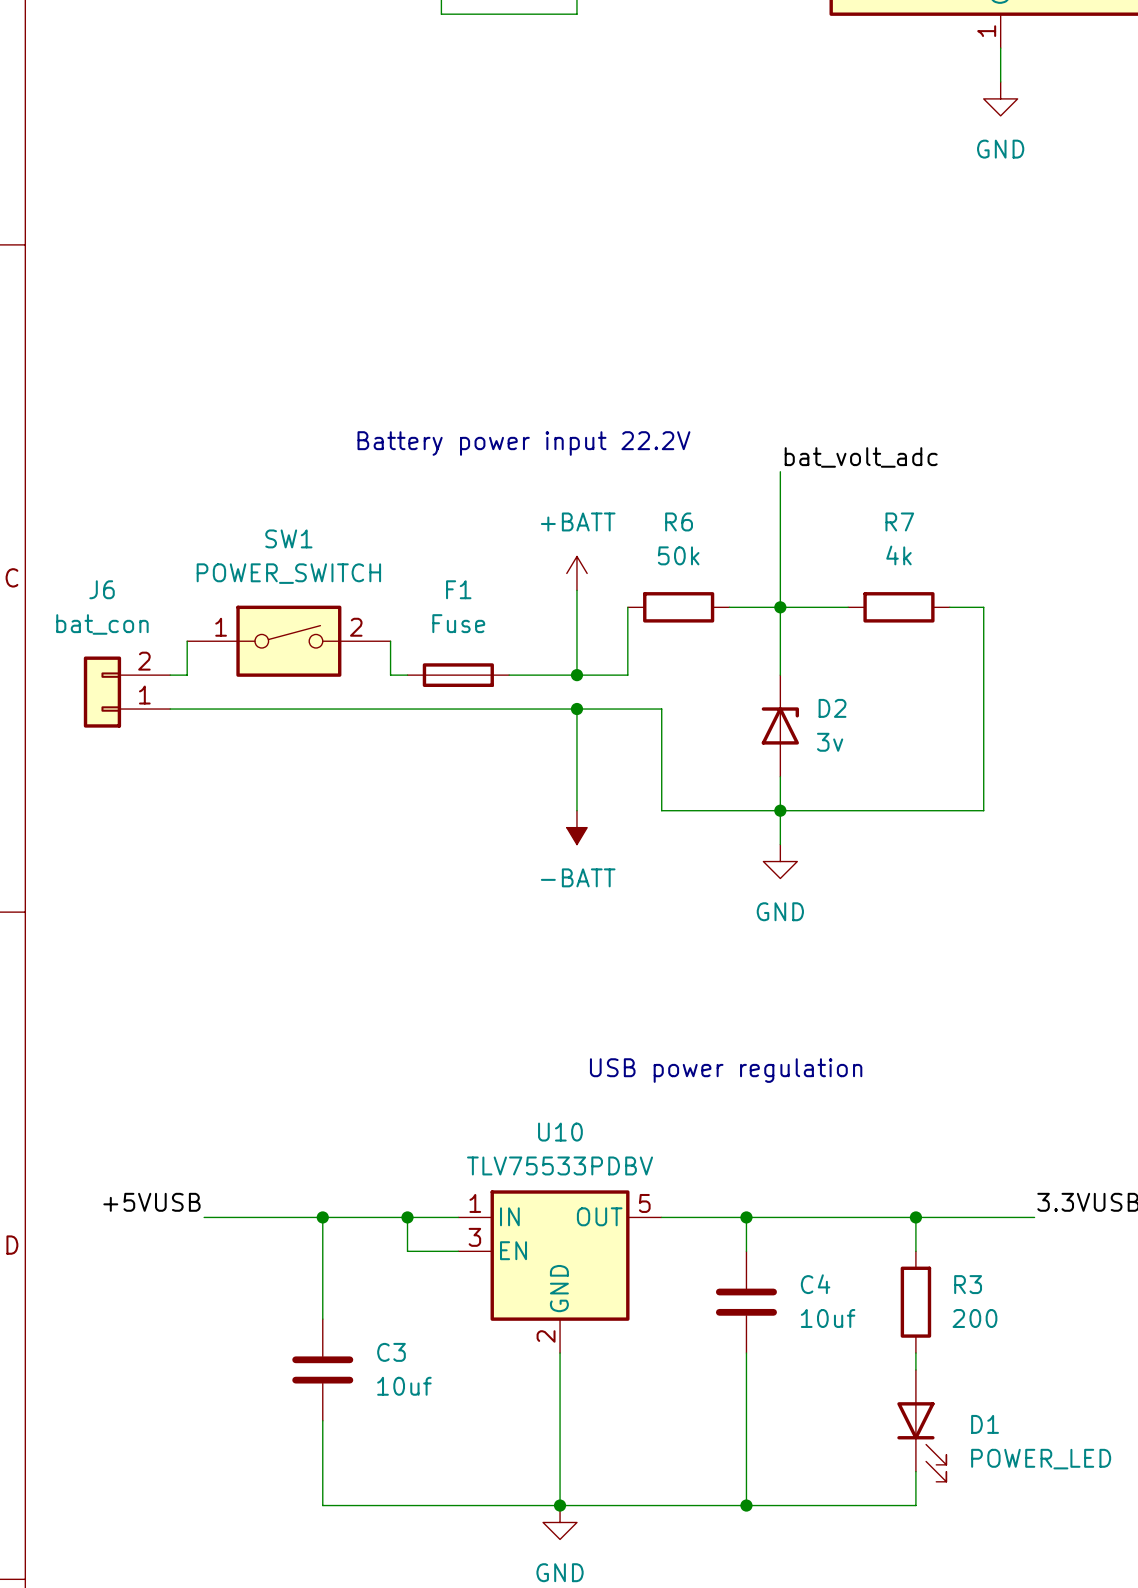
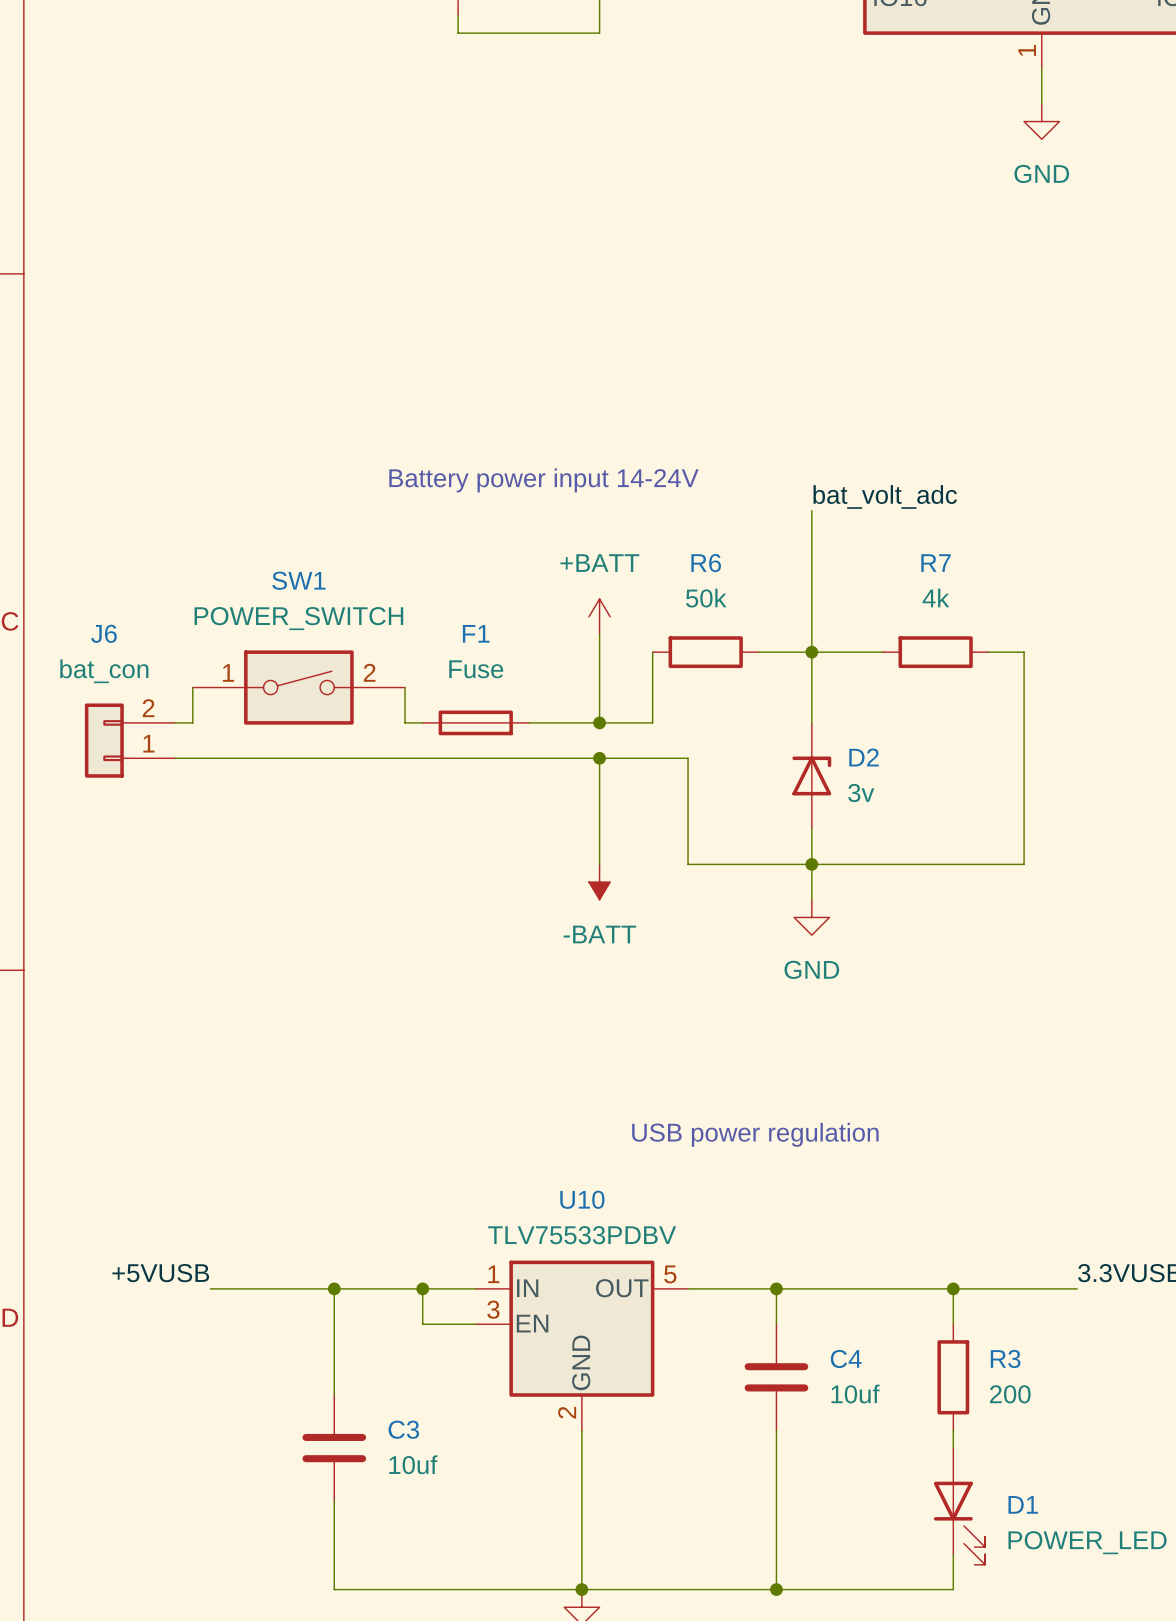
text: Battery power input 22.2V (523, 443) -> Battery power input 14-24V (543, 480)

